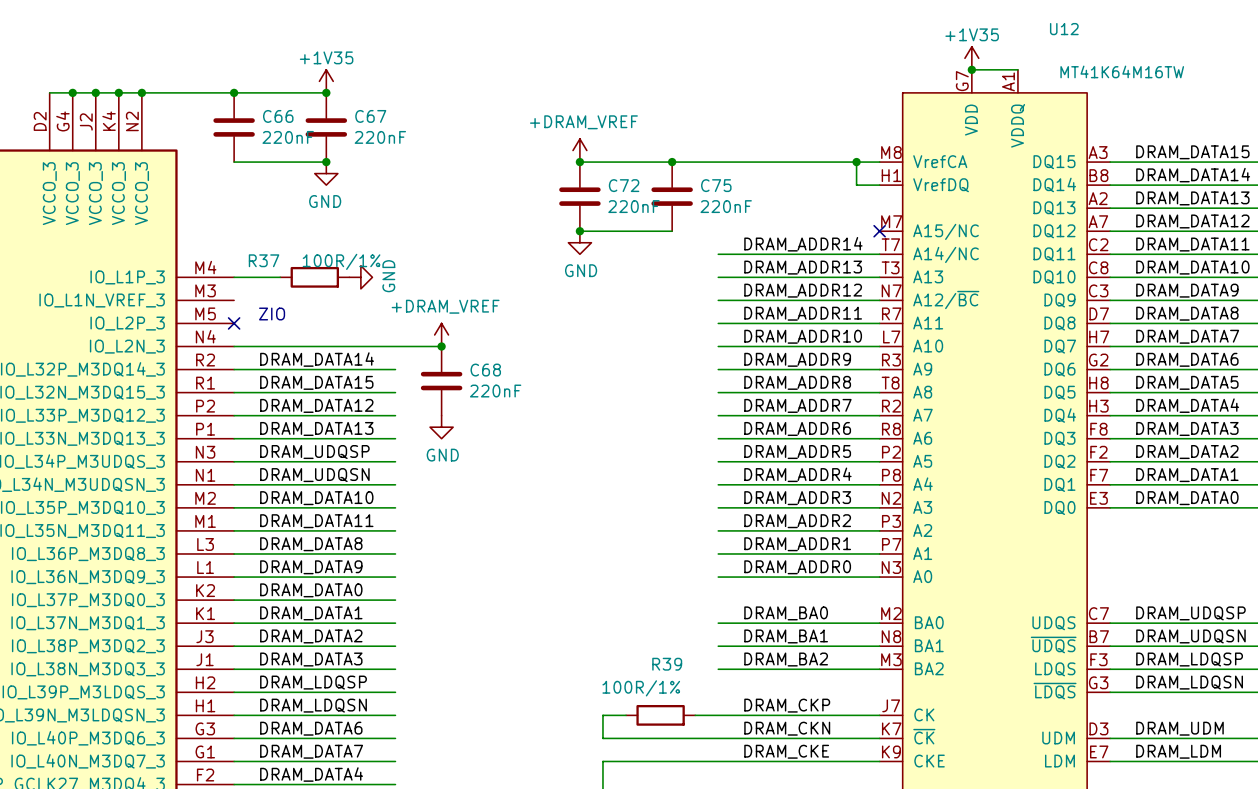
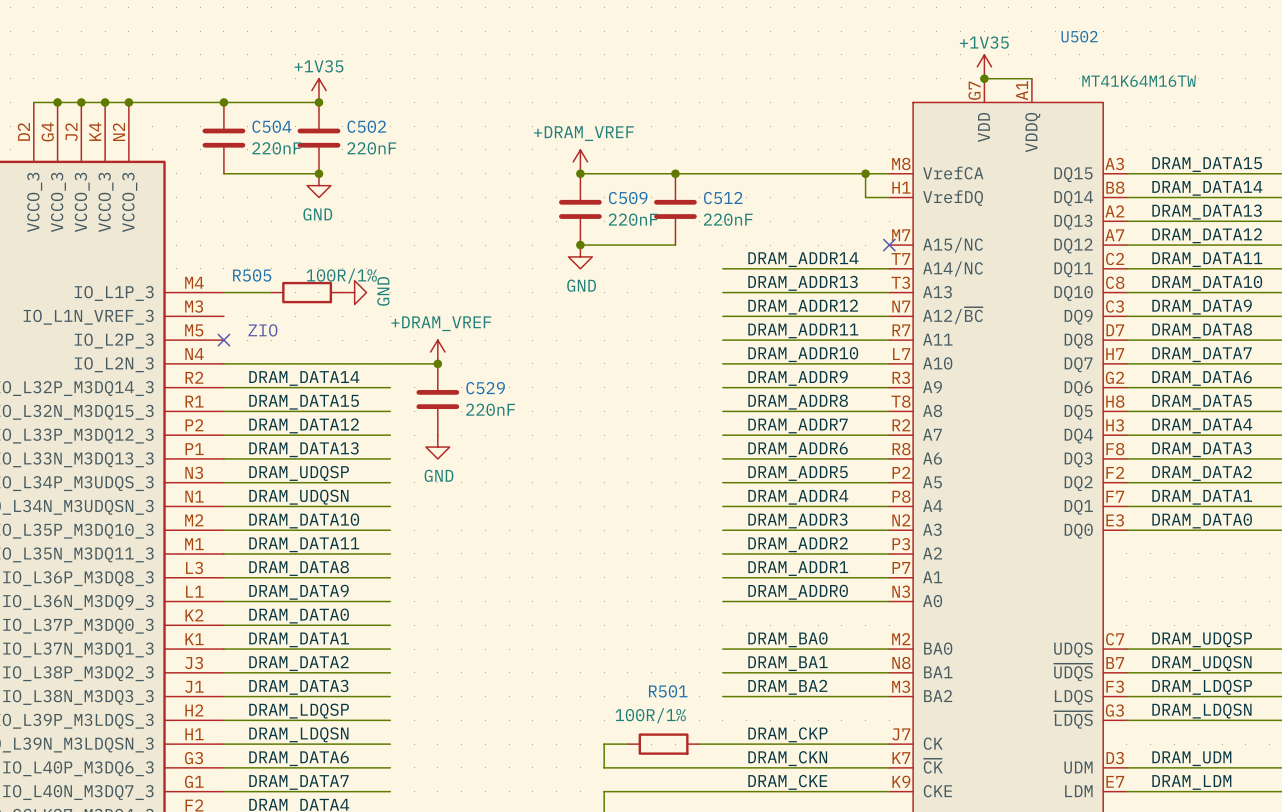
U12 name: U12 (1064, 29) -> U502 (1079, 36)
C66 name: C66 (278, 116) -> C504 (271, 126)
C67 name: C67 (370, 116) -> C502 (366, 126)
C72 name: C72 (624, 185) -> C509 (628, 198)
C75 name: C75 (716, 185) -> C512 (723, 198)
R37 name: R37 (264, 260) -> R505 (252, 275)
C68 name: C68 (485, 370) -> C529 (485, 388)
R39 name: R39 (667, 664) -> R501 (668, 691)

